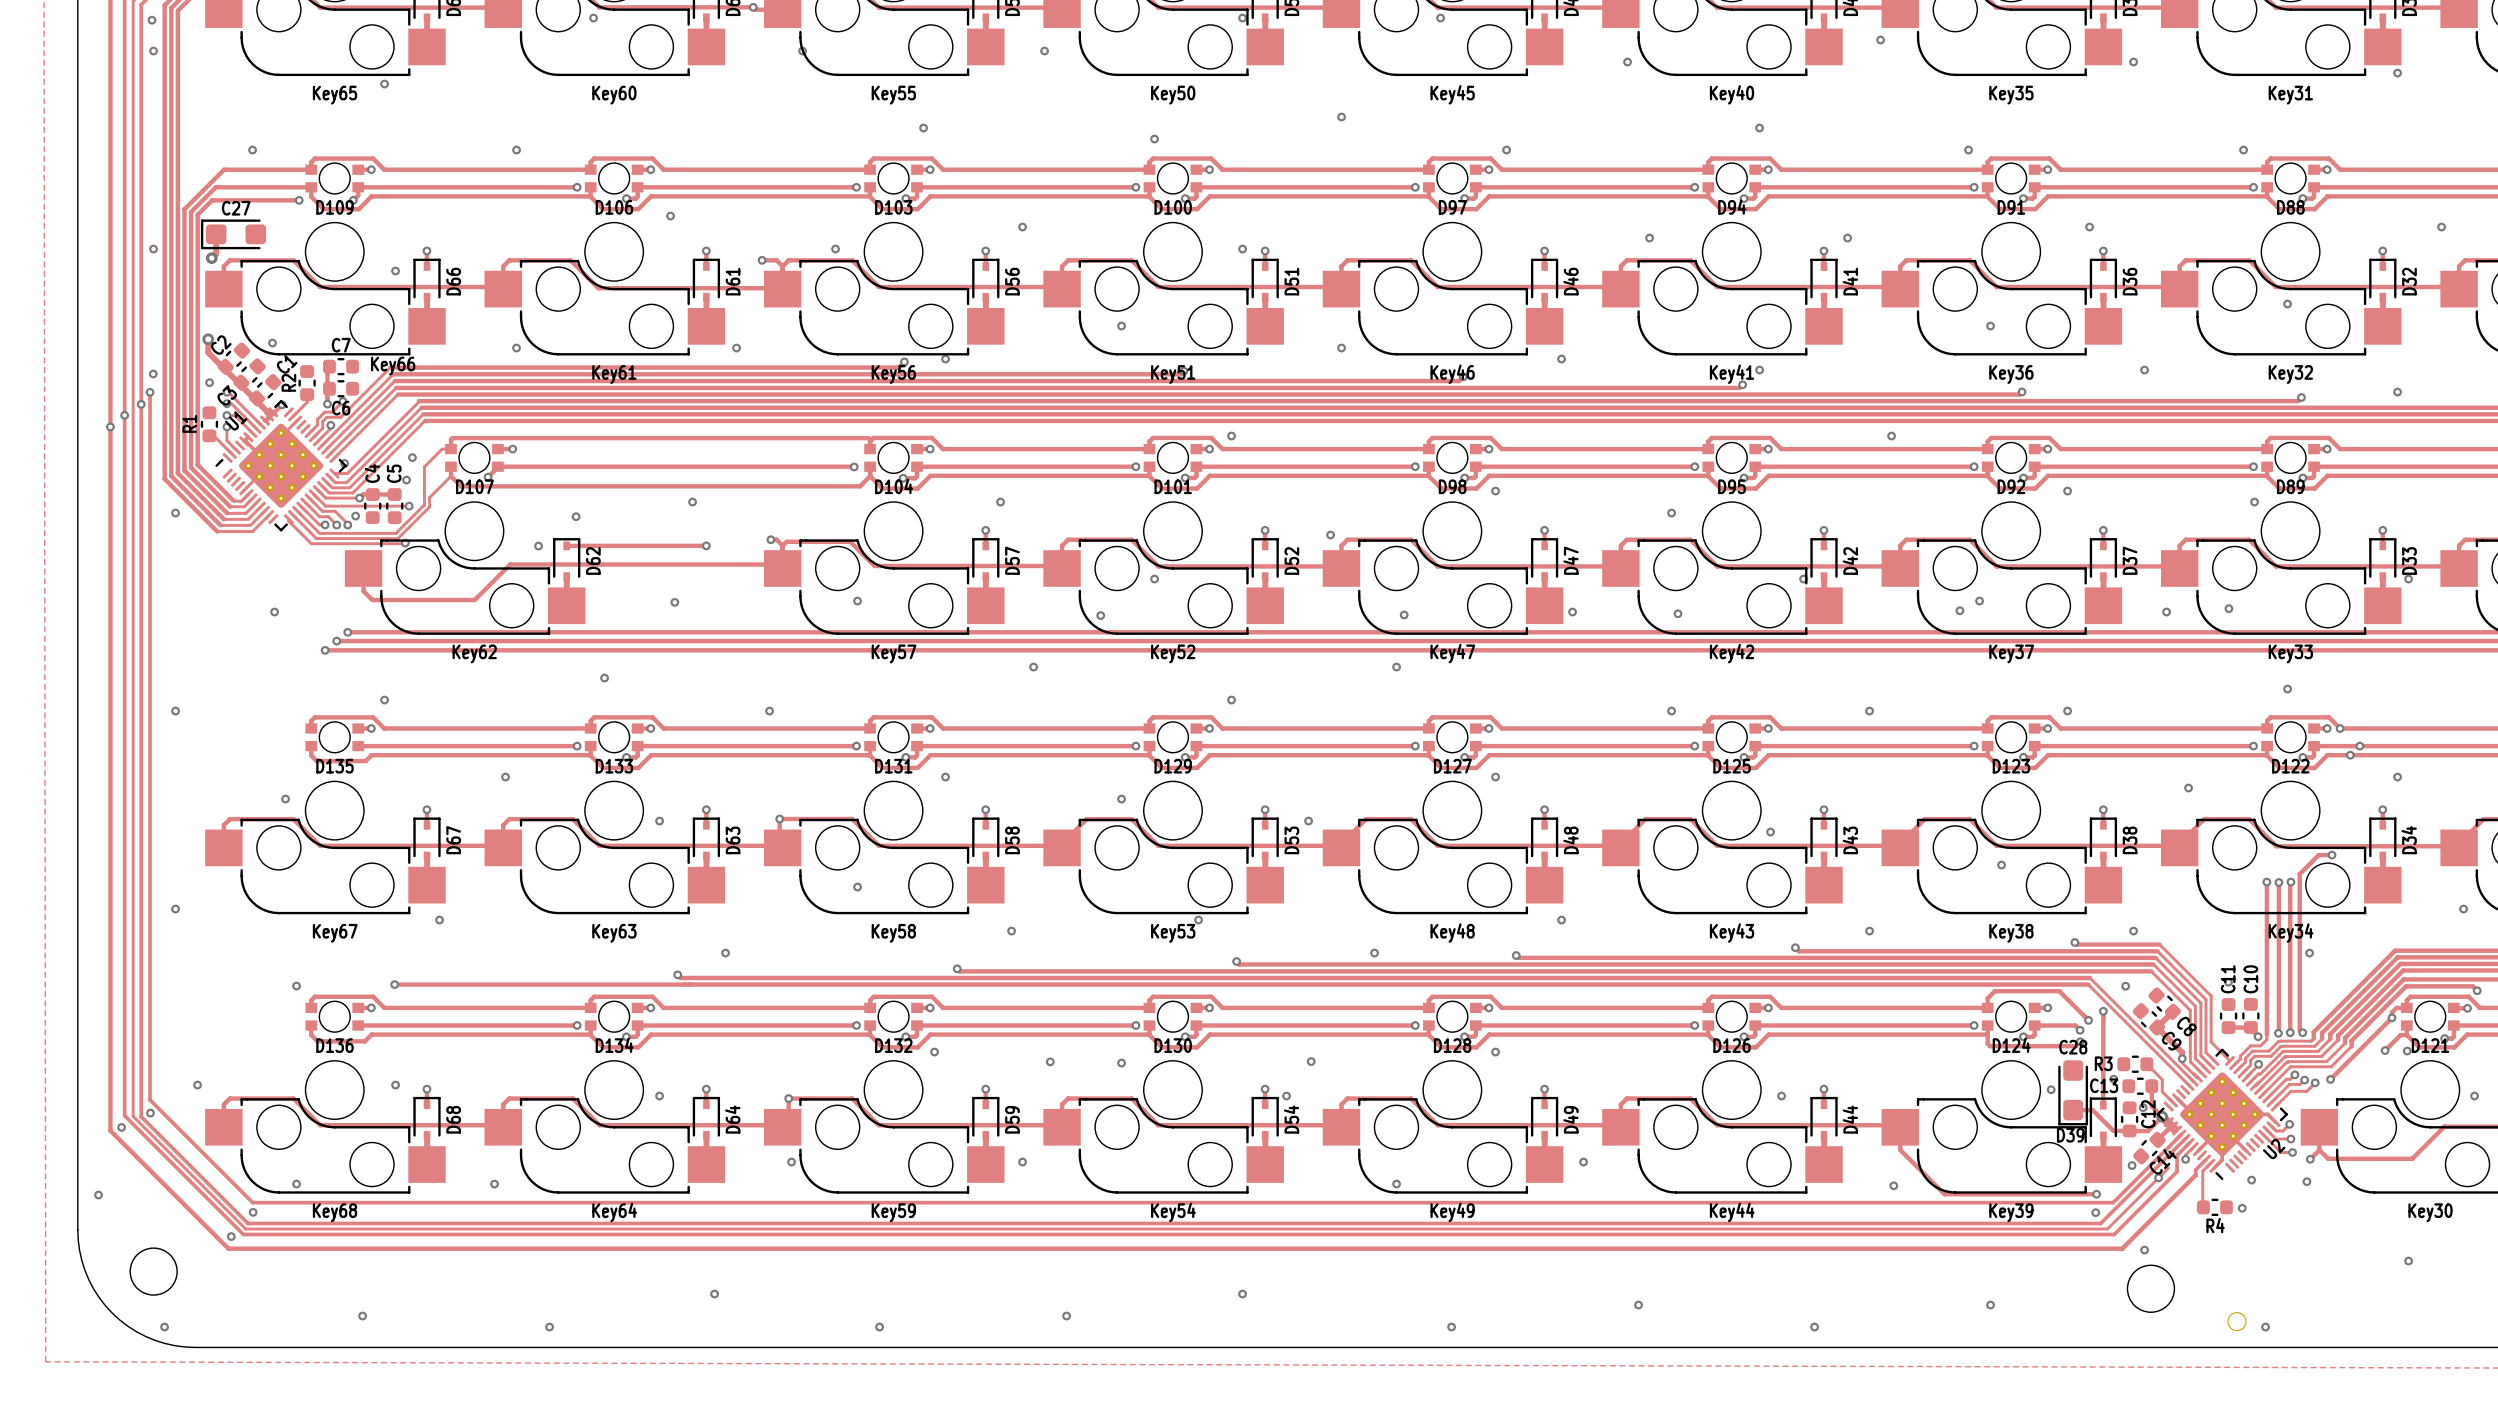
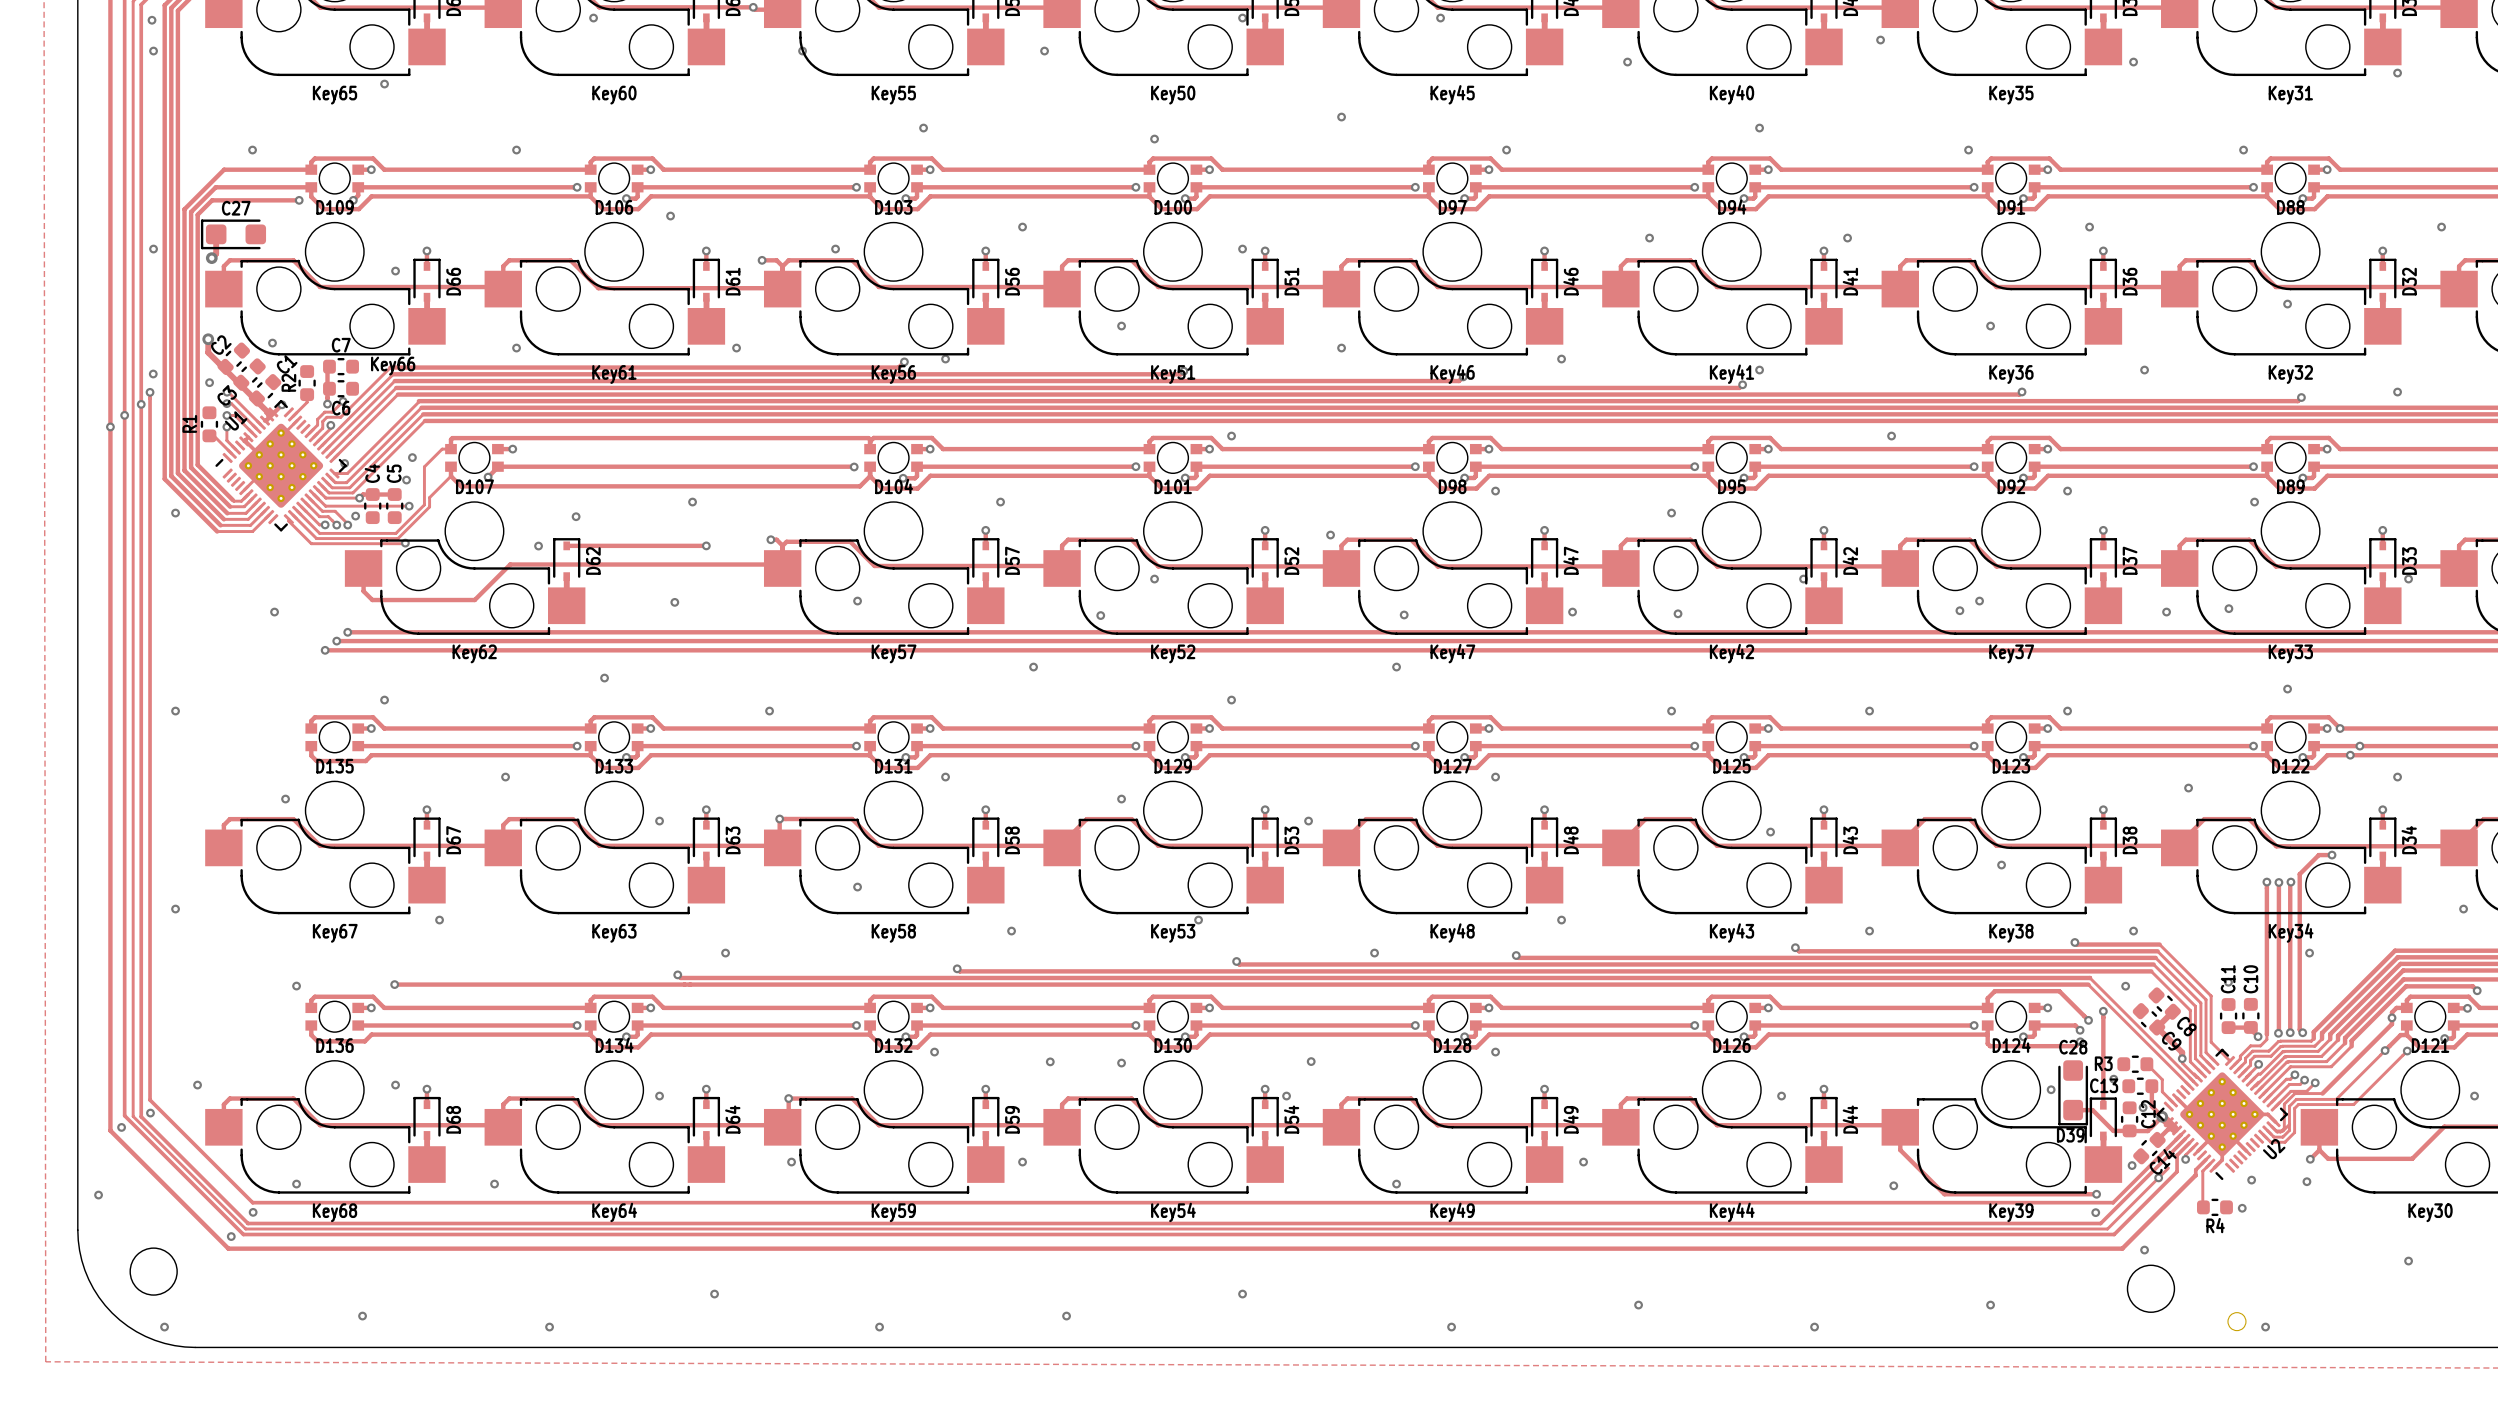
track: (2392, 1017) (2330, 1079) -> (2392, 1017) (2392, 1024) (2322, 1093) (2294, 1093) (2284, 1104) (2284, 1128) (2280, 1131) (2276, 1130)
via: (2330, 1079) -> none
via: (2289, 1124) -> none
track: (2274, 1137) (2275, 1139) (2290, 1139) -> (2274, 1137) (2282, 1137) (2289, 1130) (2289, 1106) (2296, 1099) (2336, 1099) (2385, 1050)
via: (2290, 1139) -> none
track: (2270, 1142) (2281, 1152) (2292, 1152) -> (2270, 1142) (2284, 1142) (2294, 1132) (2294, 1108) (2298, 1104) (2353, 1104) (2407, 1051)
via: (2292, 1152) -> none

